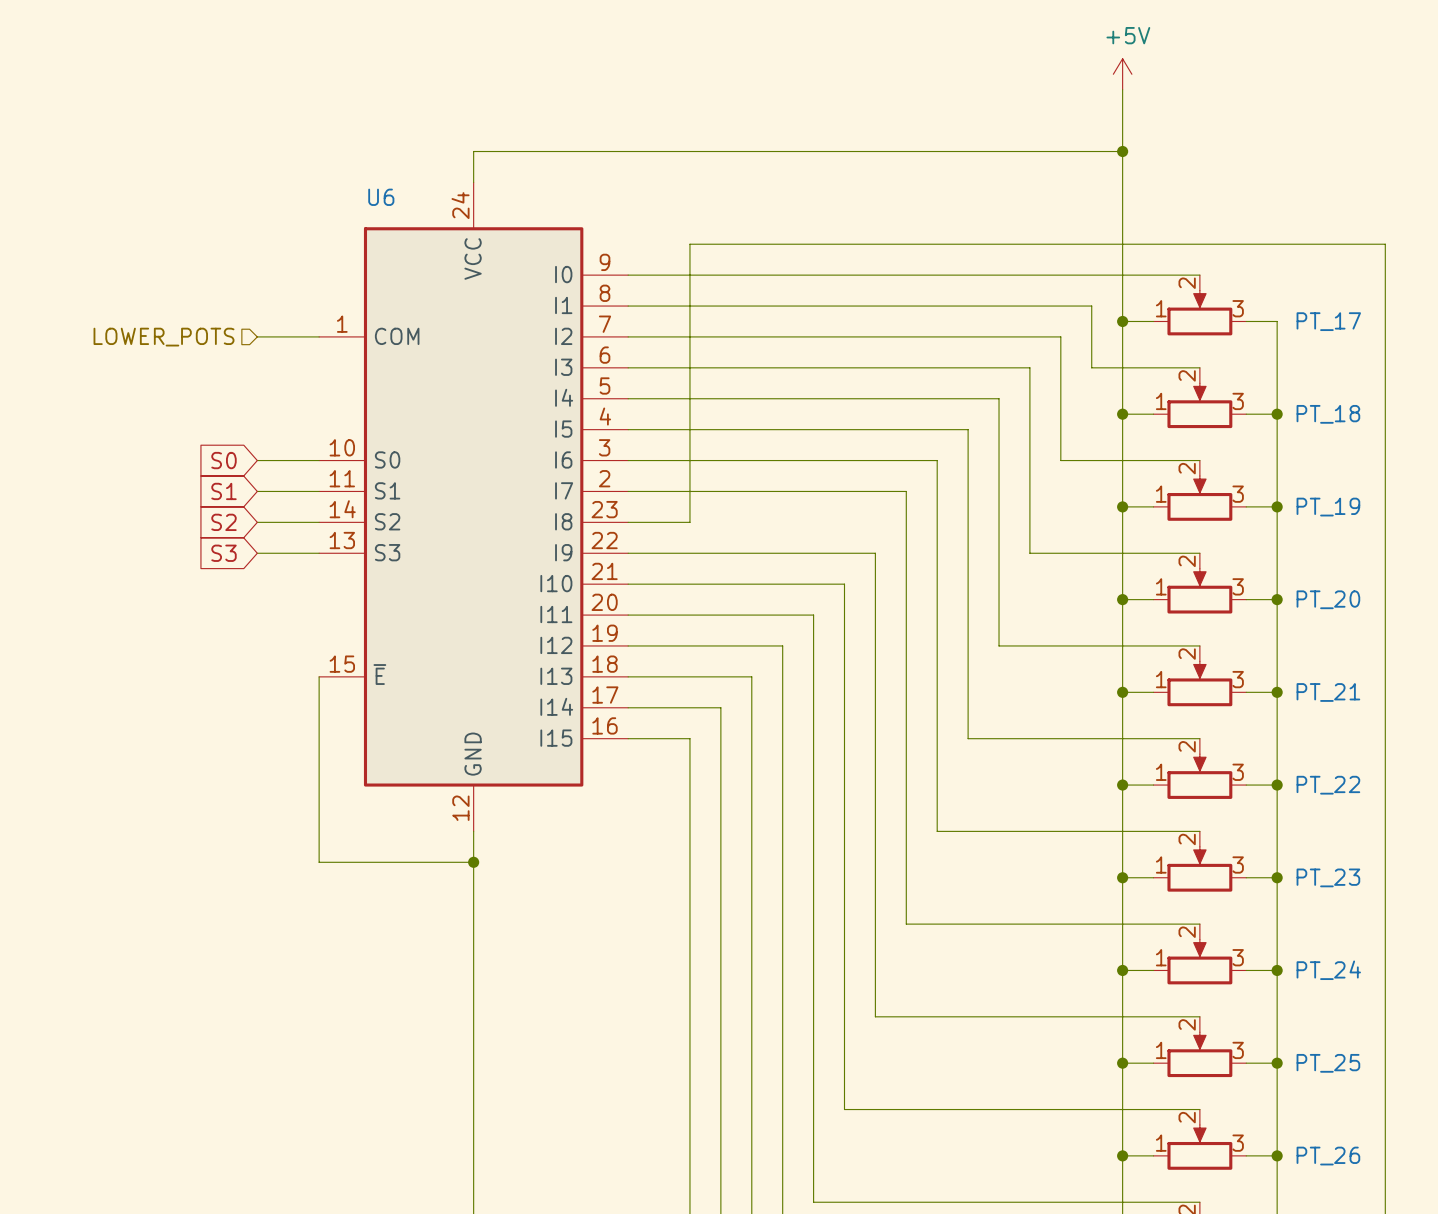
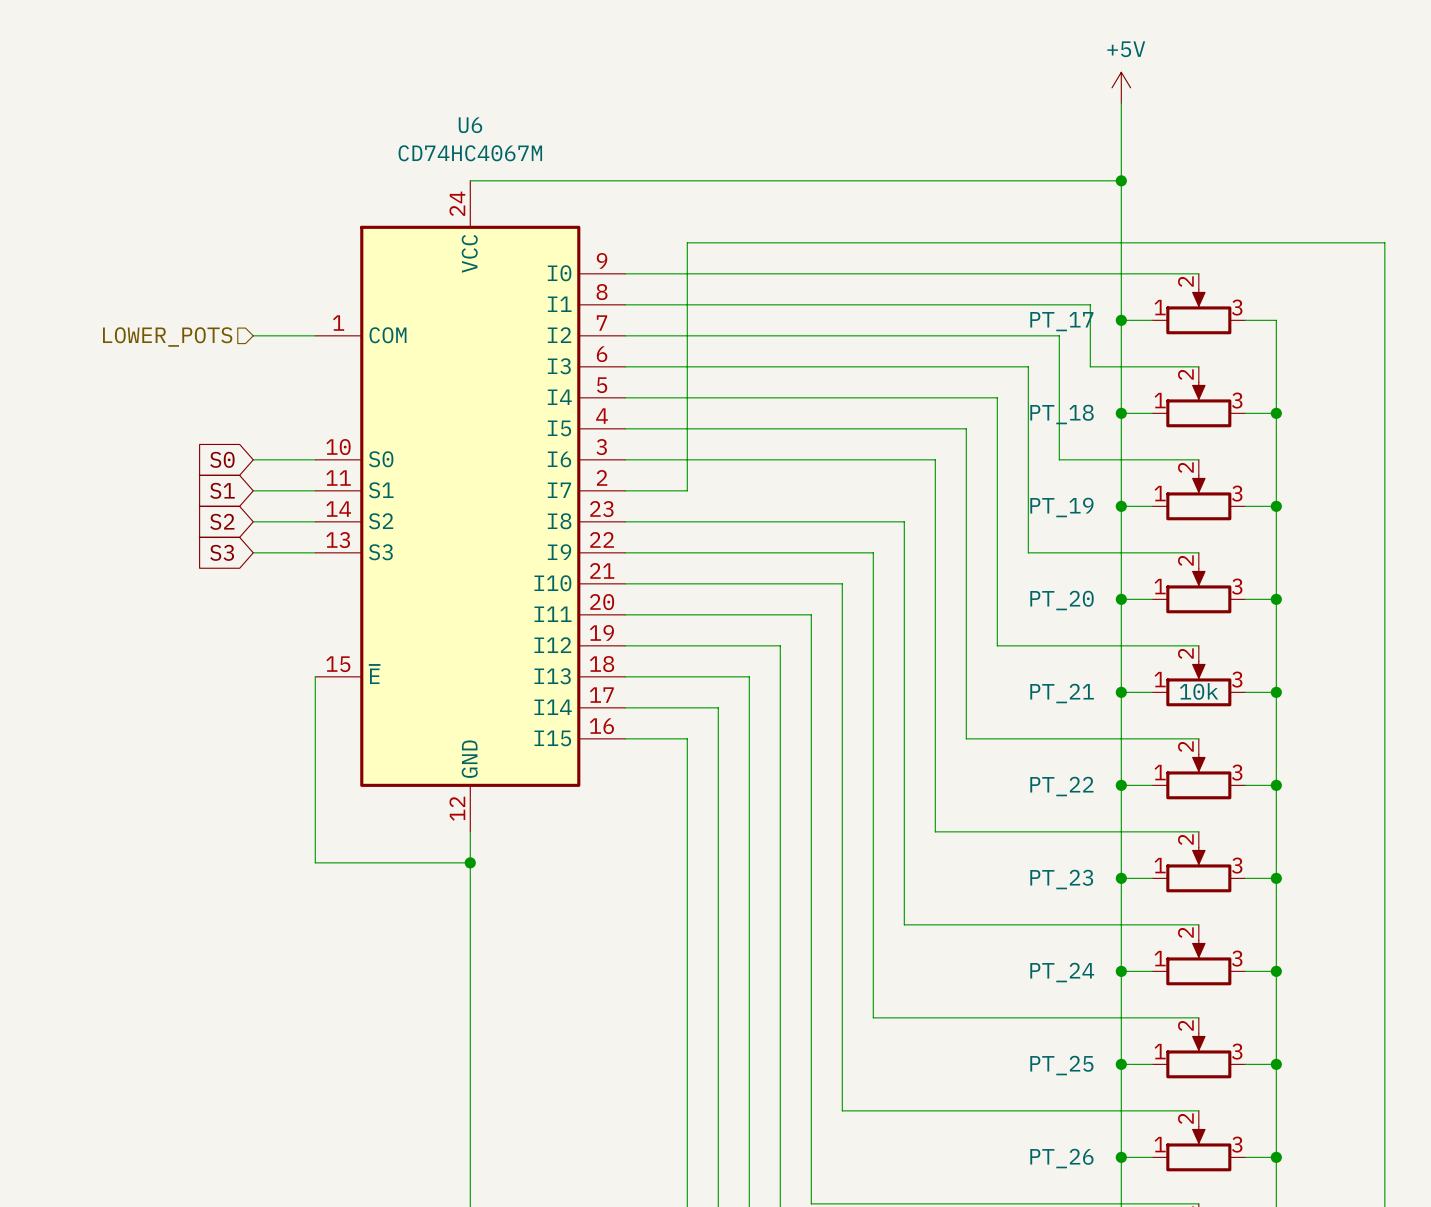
power symbol position: +5V (1122, 74) -> +5V (1121, 87)
wire: (1122, 151) (473, 151) (473, 182) -> (1121, 180) (470, 180)
junction position: (1122, 151) -> (1121, 180)
U6 value: none -> CD74HC4067M (470, 153)
U6 name position: U6 (381, 197) -> U6 (470, 125)
PT_17 name position: PT_17 (1328, 321) -> PT_17 (1061, 321)
PT_18 name position: PT_18 (1328, 414) -> PT_18 (1062, 414)
PT_19 name position: PT_19 (1328, 507) -> PT_19 (1061, 507)
wire: (689, 522) (689, 491) (906, 491) (906, 522) -> (687, 521) (904, 521)
PT_20 name position: PT_20 (1328, 599) -> PT_20 (1062, 600)
PT_21 value: none -> 10k (1199, 691)
PT_21 name position: PT_21 (1328, 692) -> PT_21 (1062, 693)
PT_22 name position: PT_22 (1328, 785) -> PT_22 (1061, 786)
PT_23 name position: PT_23 (1328, 877) -> PT_23 (1061, 879)
PT_24 name position: PT_24 (1328, 970) -> PT_24 (1062, 972)
PT_25 name position: PT_25 (1328, 1063) -> PT_25 (1061, 1065)
PT_26 name position: PT_26 (1328, 1156) -> PT_26 (1061, 1158)

